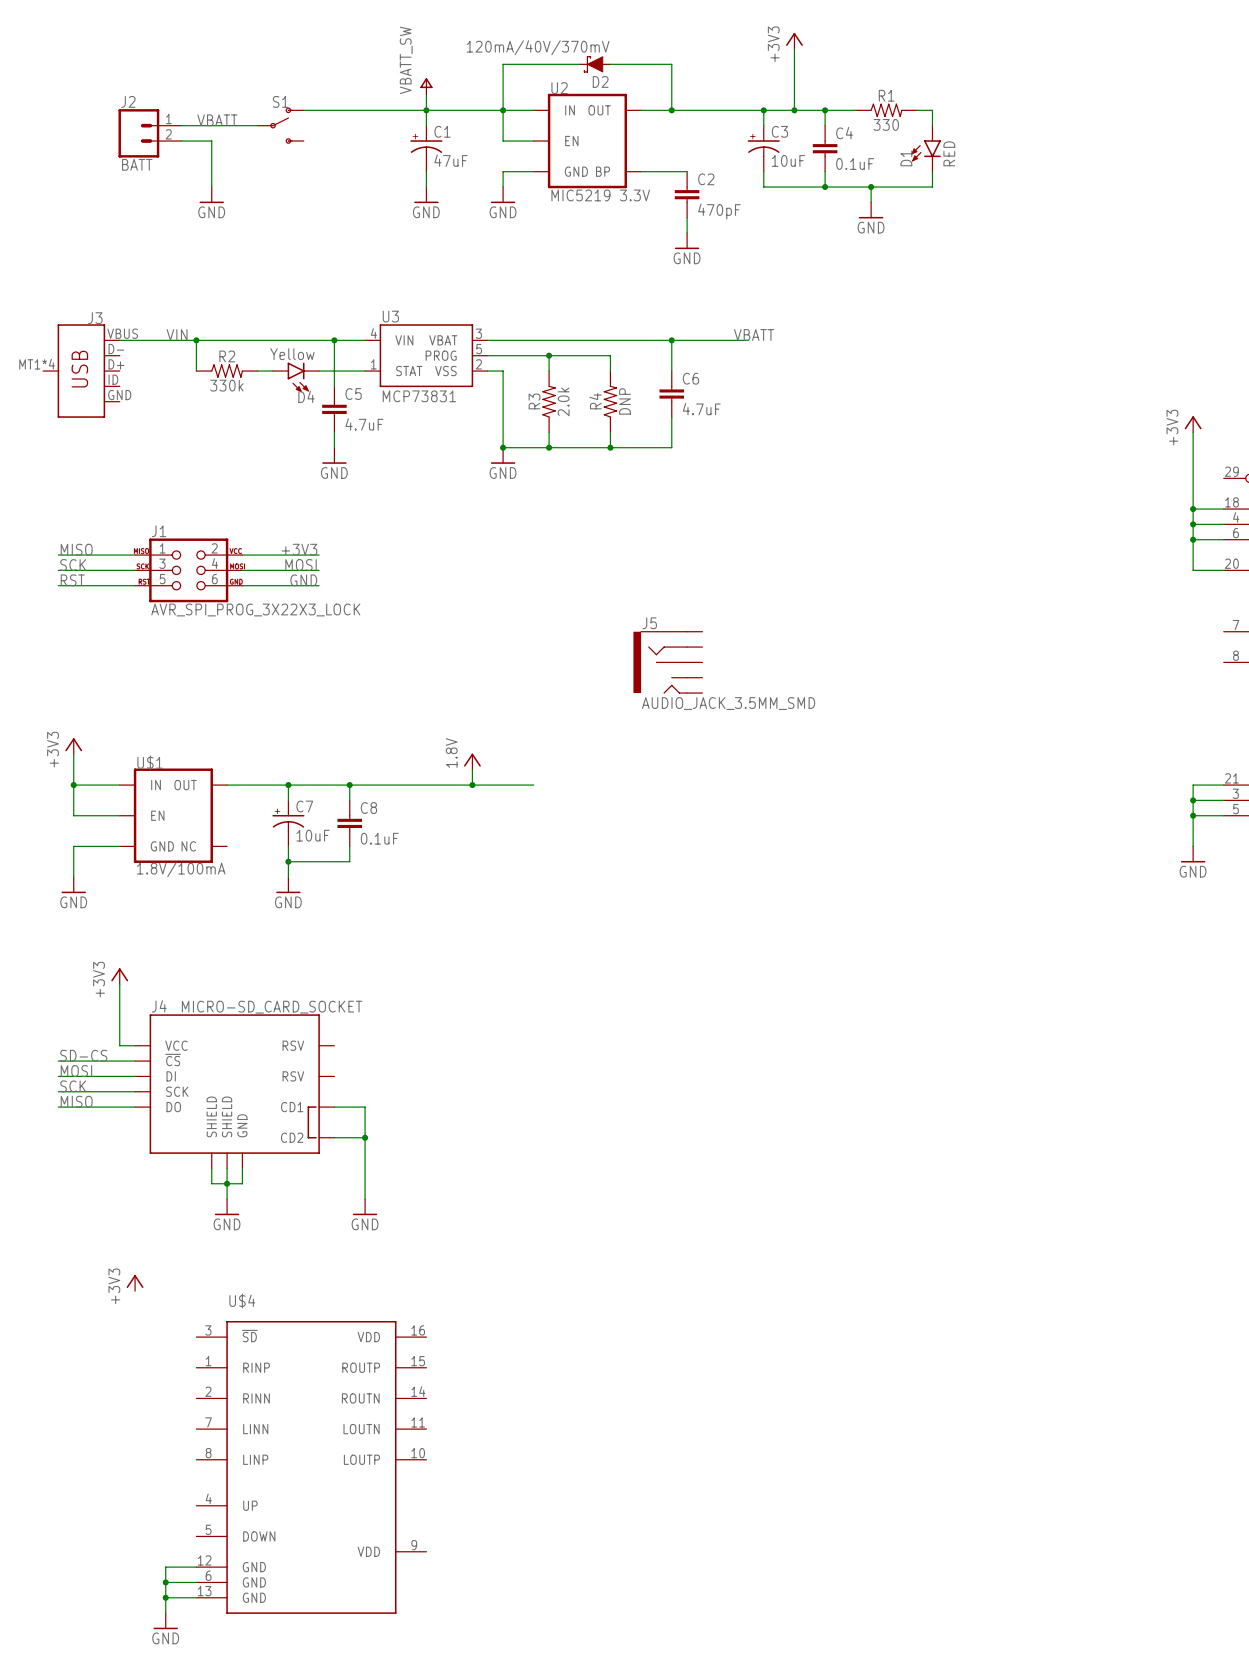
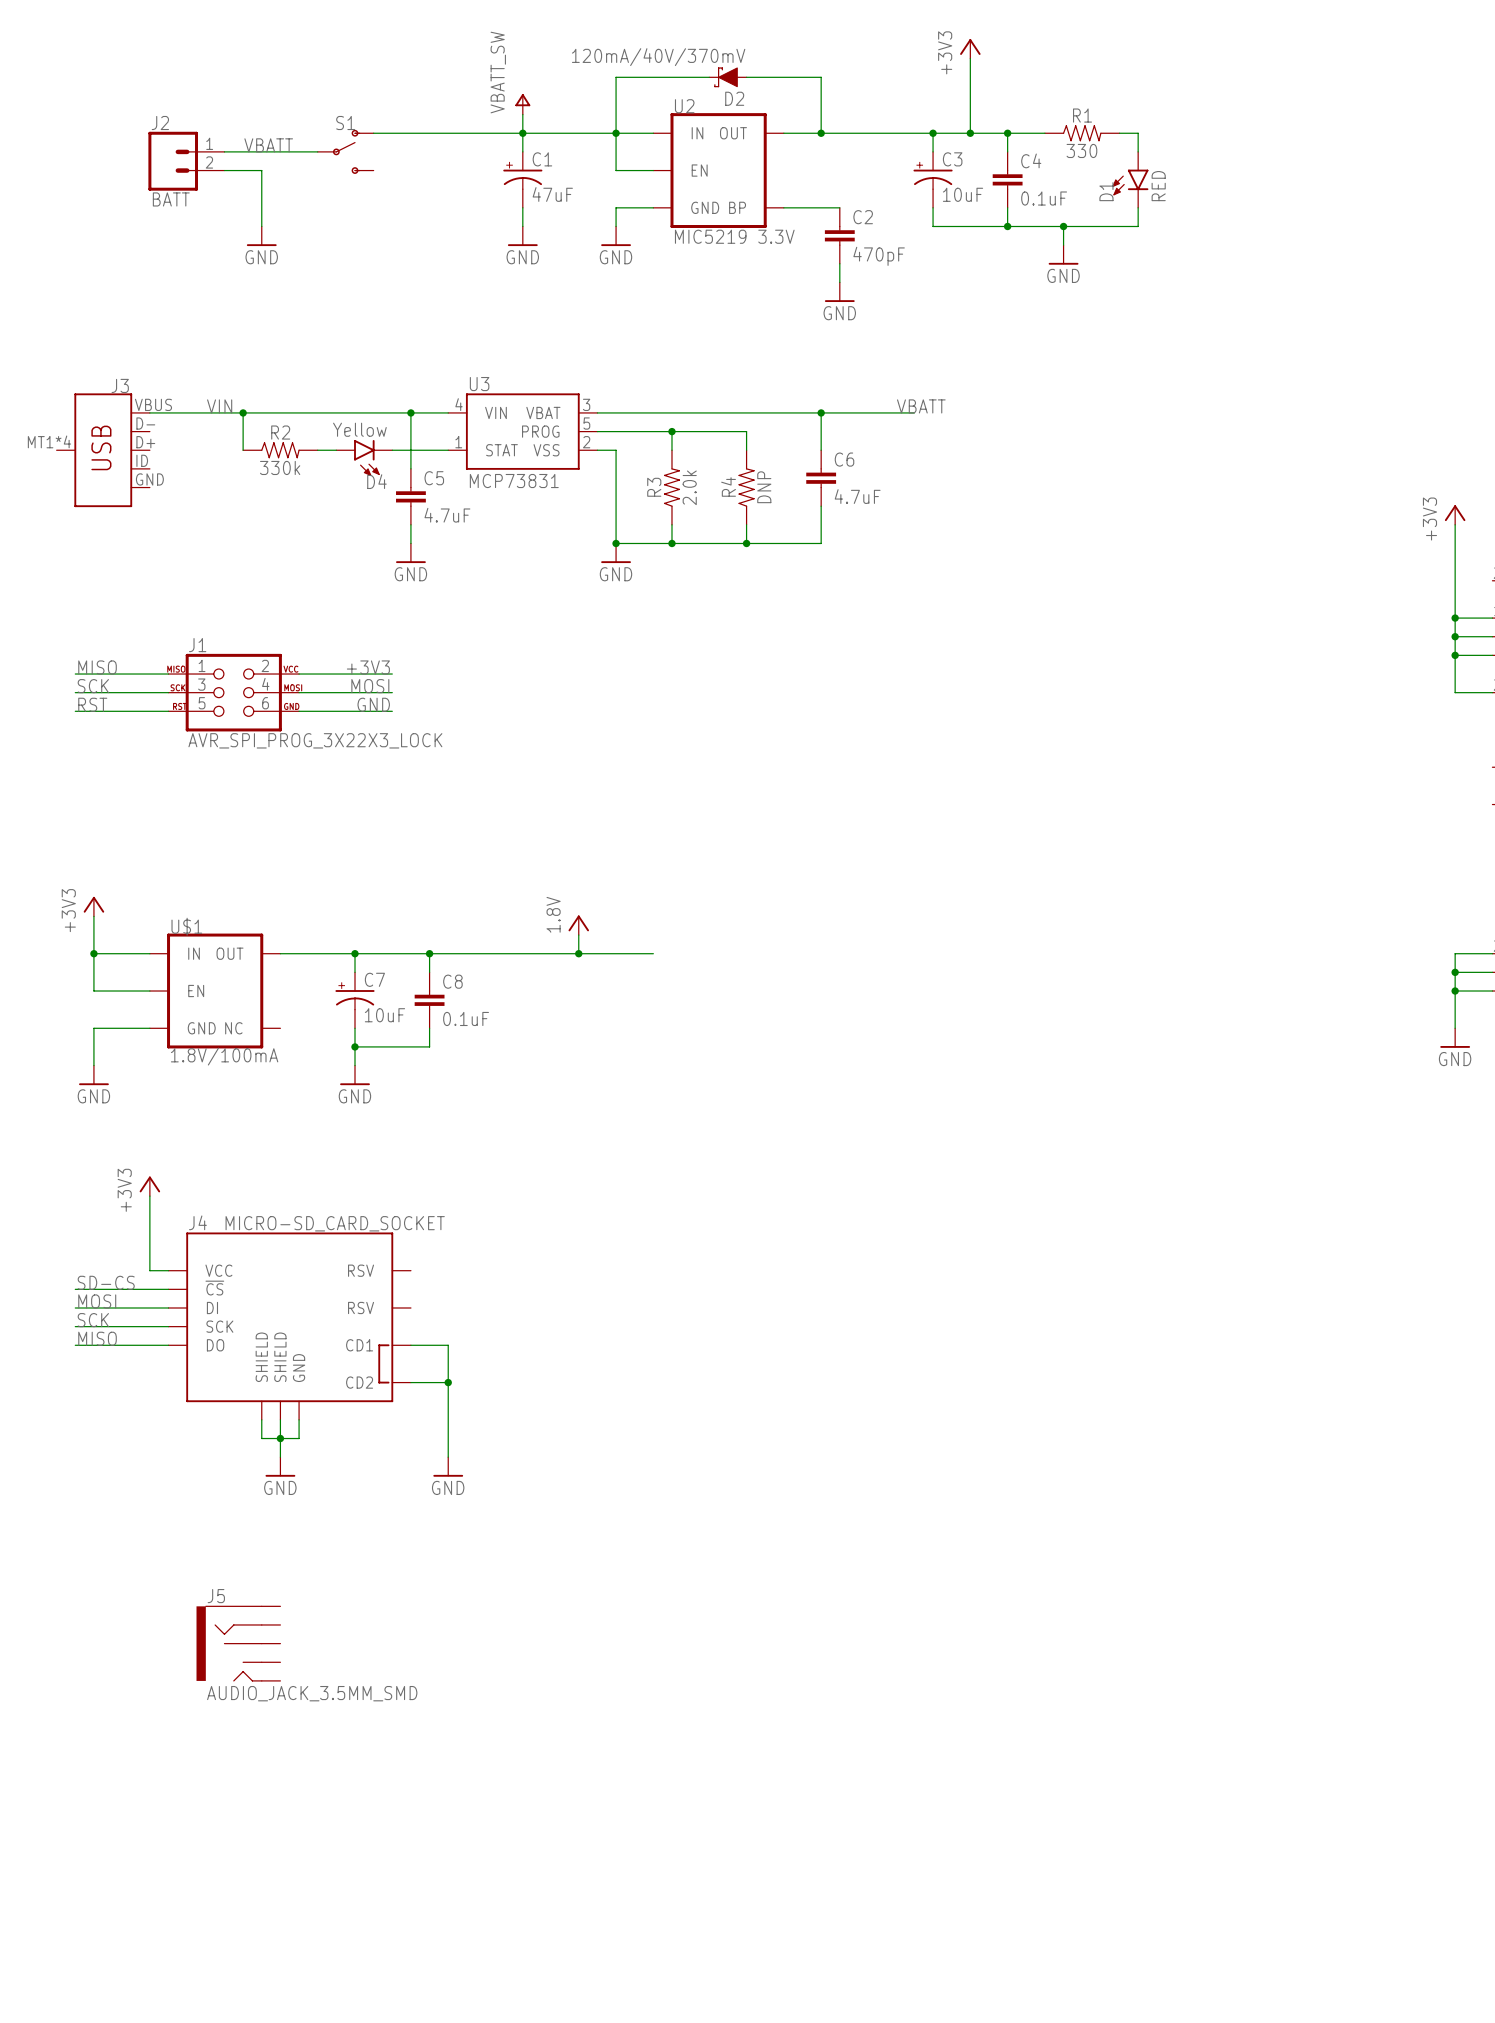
J5 position: (667, 662) -> (238, 1643)
power symbol: +3V3 (135, 1283) -> none
U$4: (311, 1467) -> none
wire: (196, 1567) (165, 1567) (165, 1613) -> none
wire: (165, 1582) (196, 1582) -> none
junction: (165, 1582) -> none
wire: (165, 1597) (196, 1597) -> none
junction: (165, 1597) -> none
power symbol: GND (165, 1621) -> none

